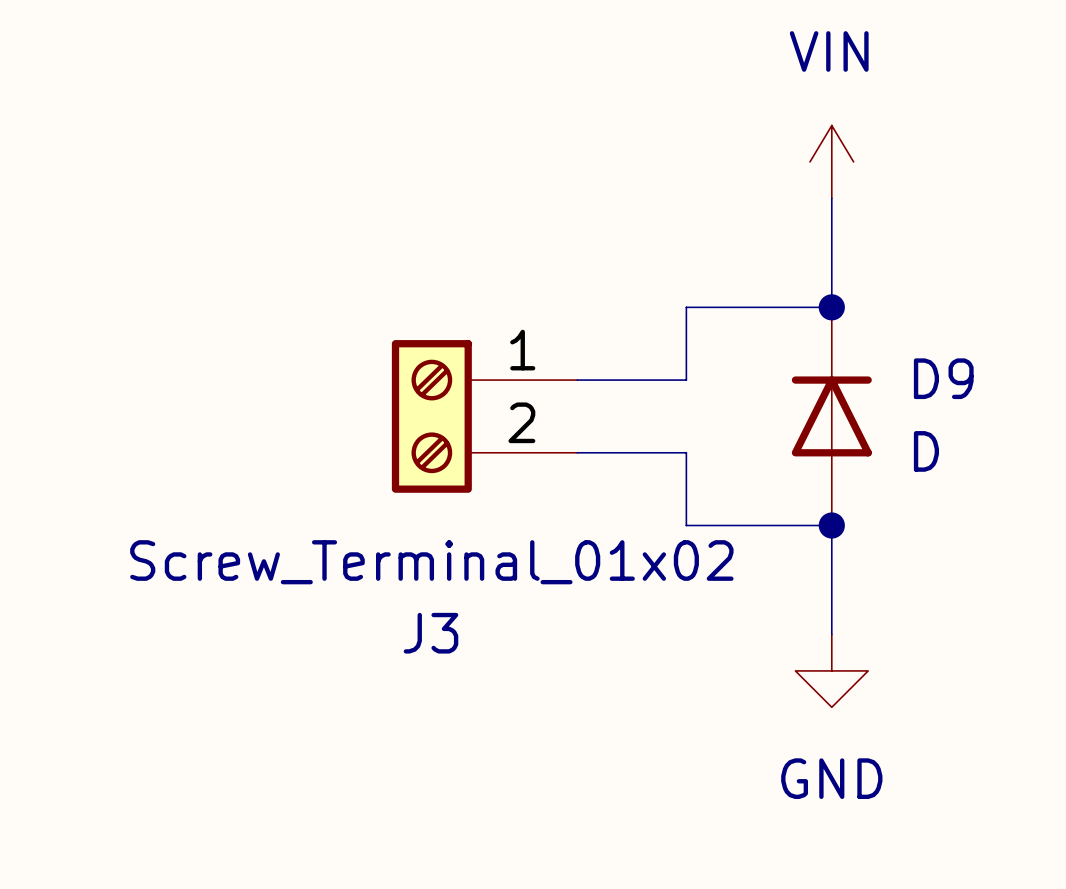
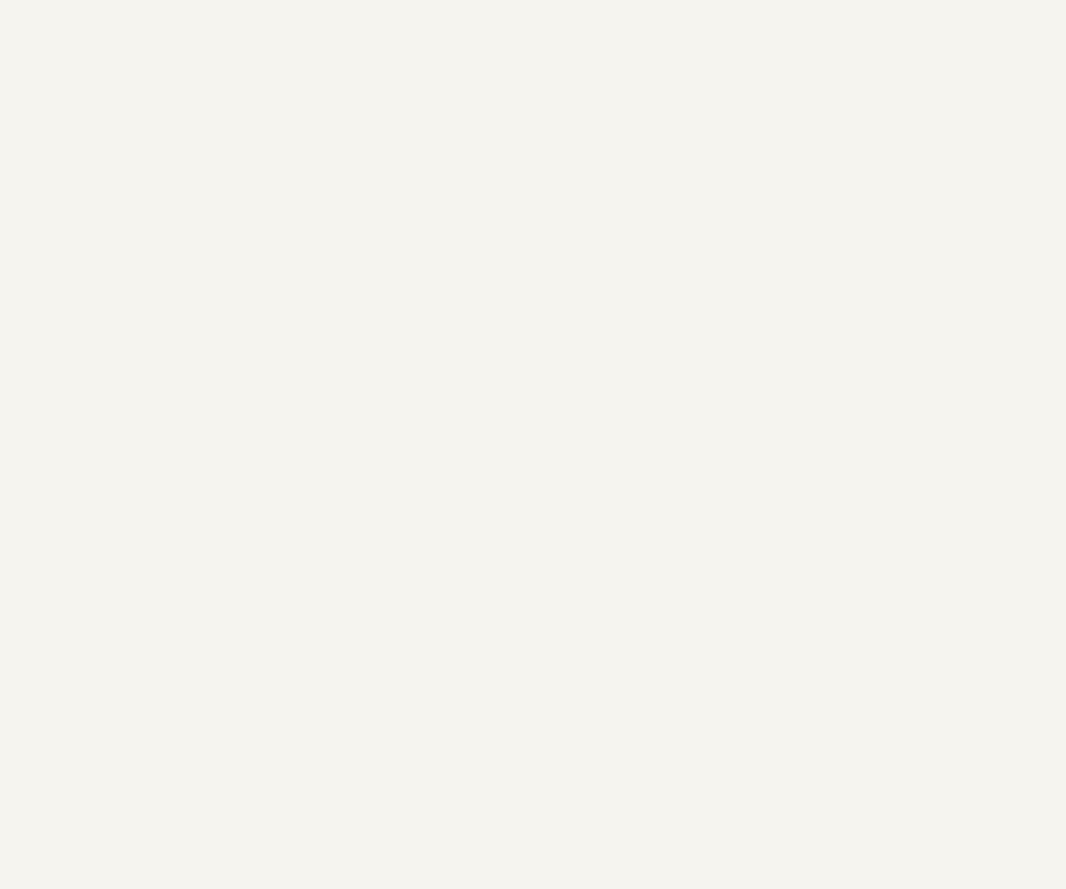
power symbol: VIN (831, 161) -> none
wire: (831, 198) (831, 307) (686, 307) (686, 380) (577, 380) -> none
junction: (831, 307) -> none
J3: Screw_Terminal_01x02 (484, 416) -> none
D9: D (831, 416) -> none
wire: (577, 452) (686, 452) (686, 525) (831, 525) (831, 634) -> none
junction: (831, 525) -> none
power symbol: GND (831, 670) -> none

